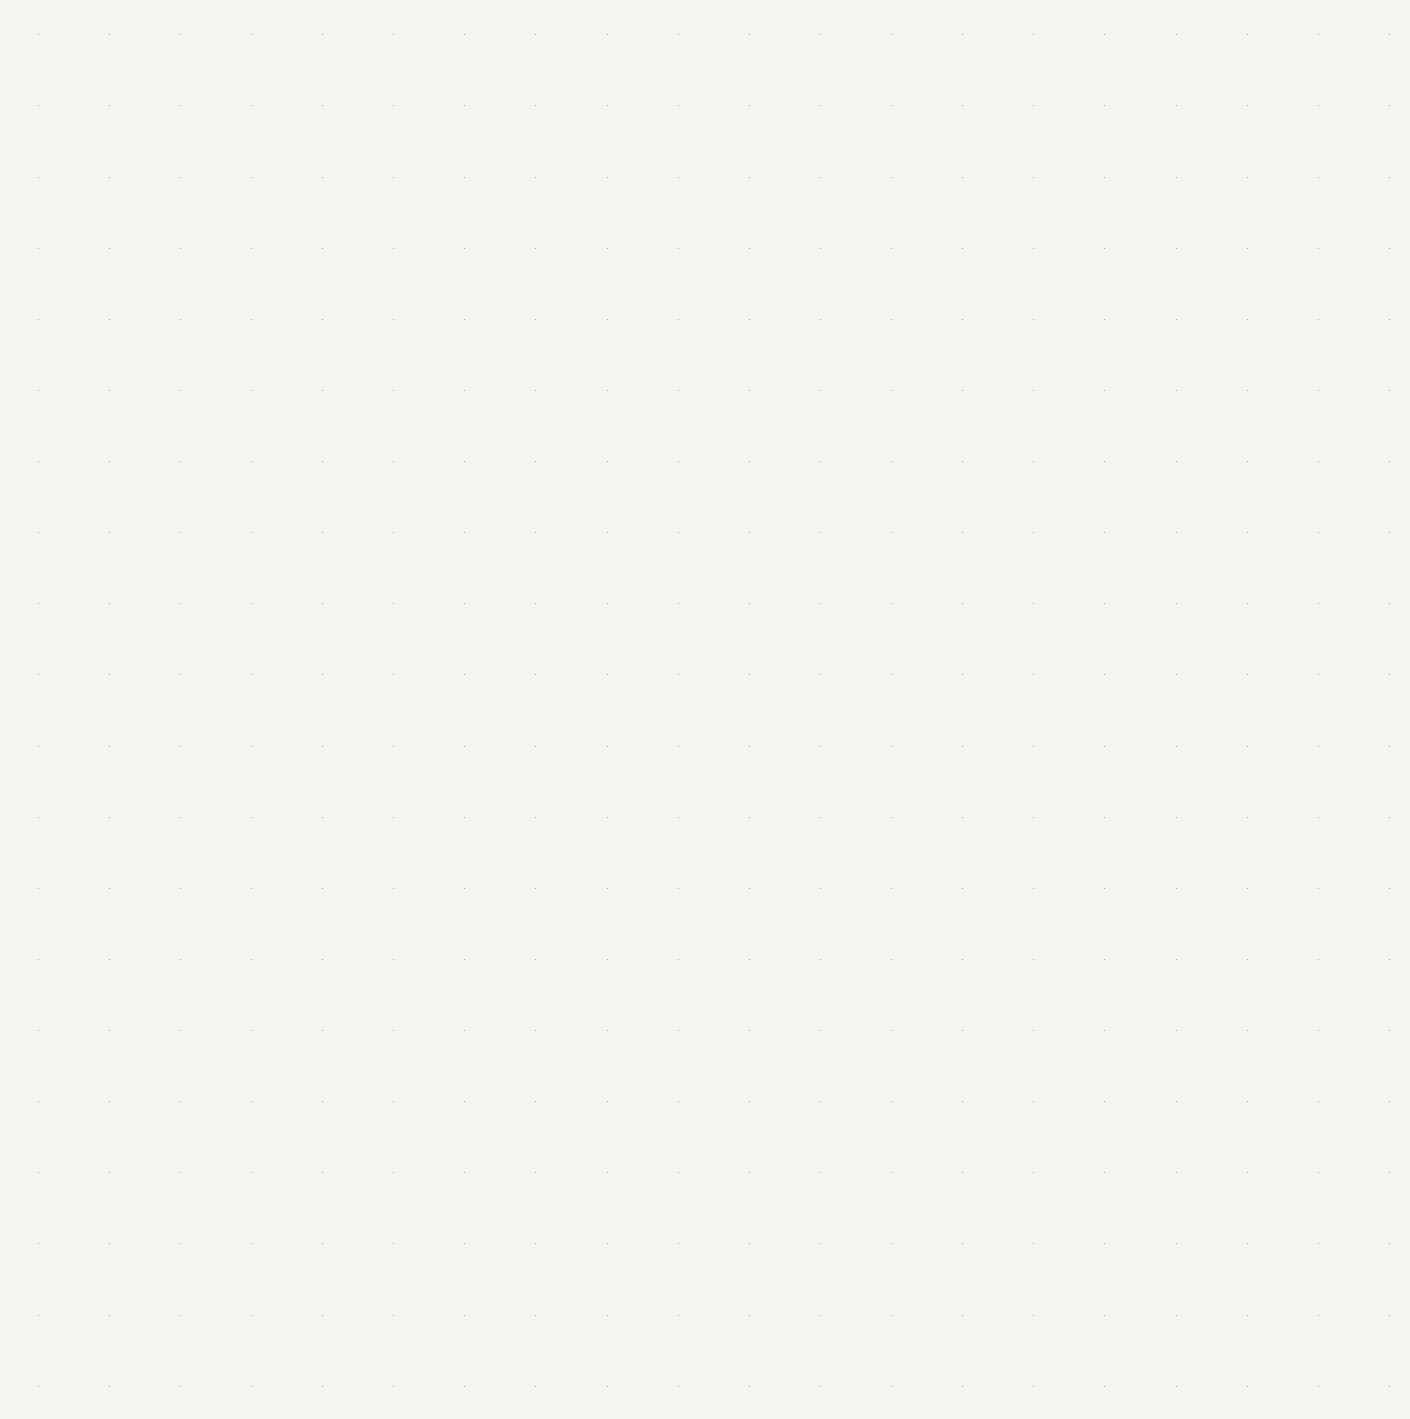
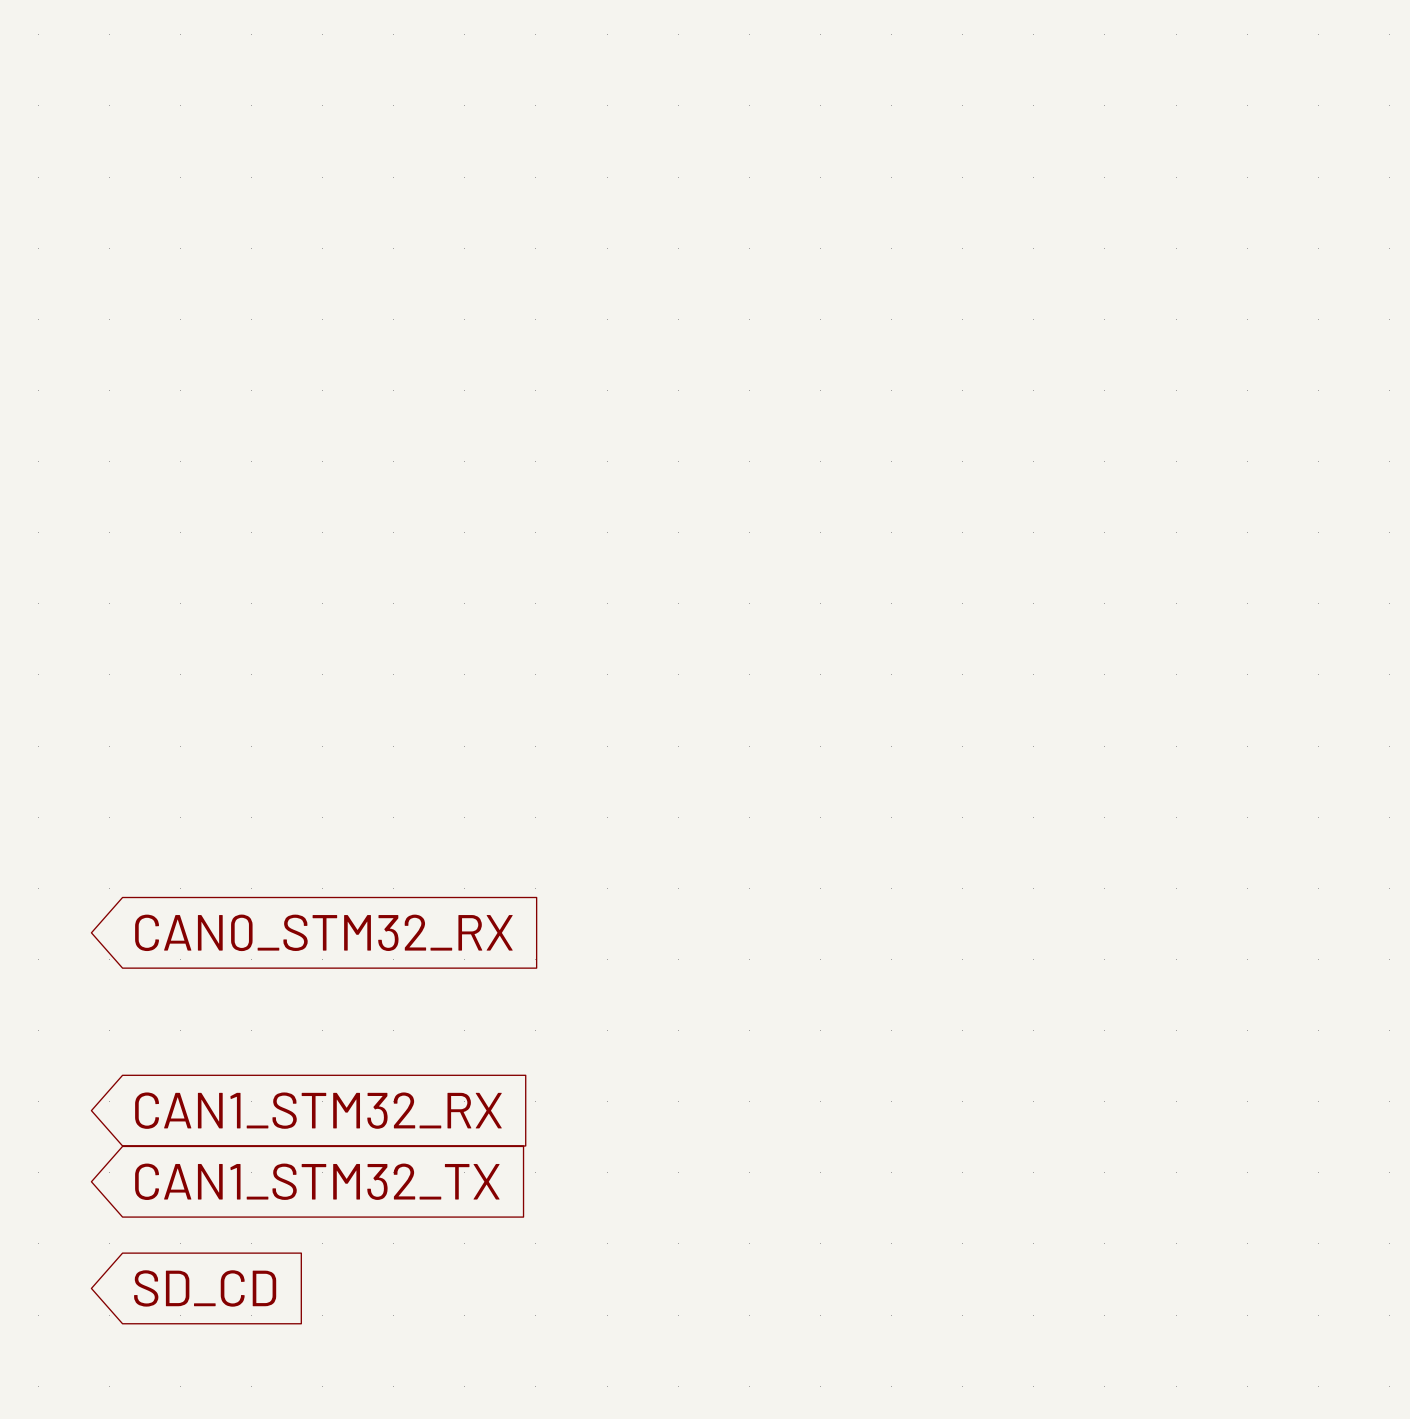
global label: none -> CAN0_STM32_RX (323, 932)
global label: none -> CAN1_STM32_RX (318, 1110)
global label: none -> CAN1_STM32_TX (317, 1181)
global label: none -> SD_CD (205, 1288)

